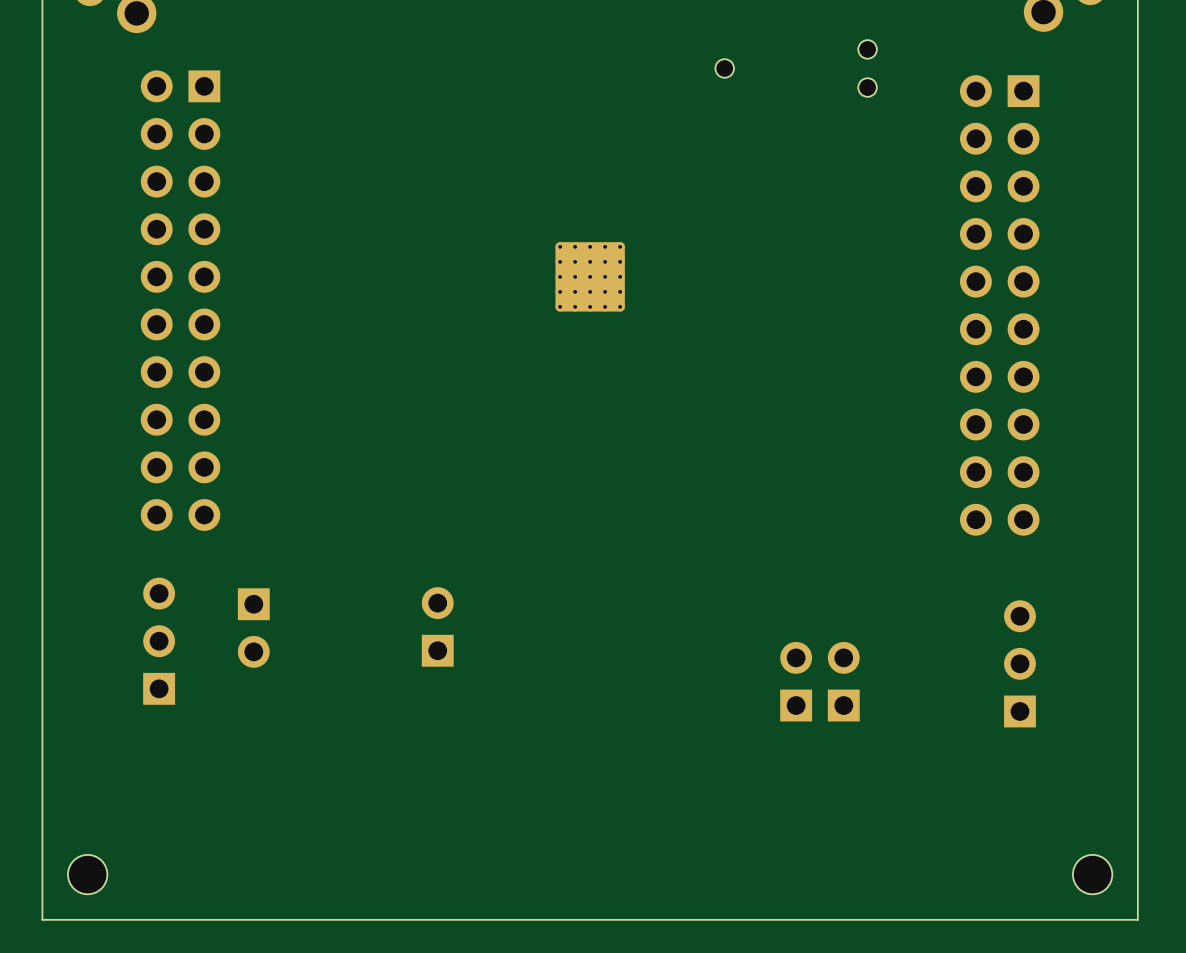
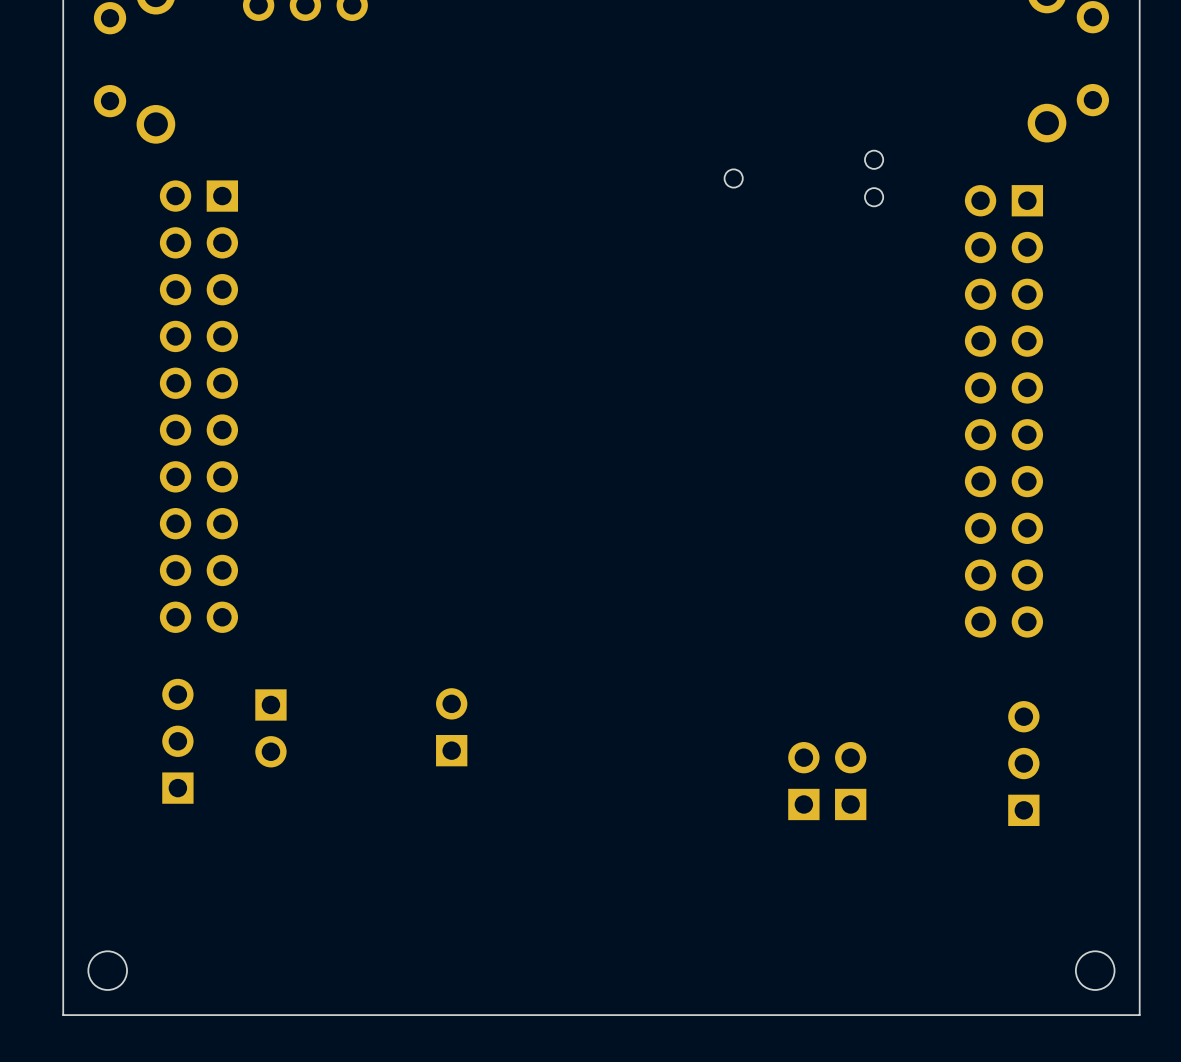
part: (590, 276) -> none

